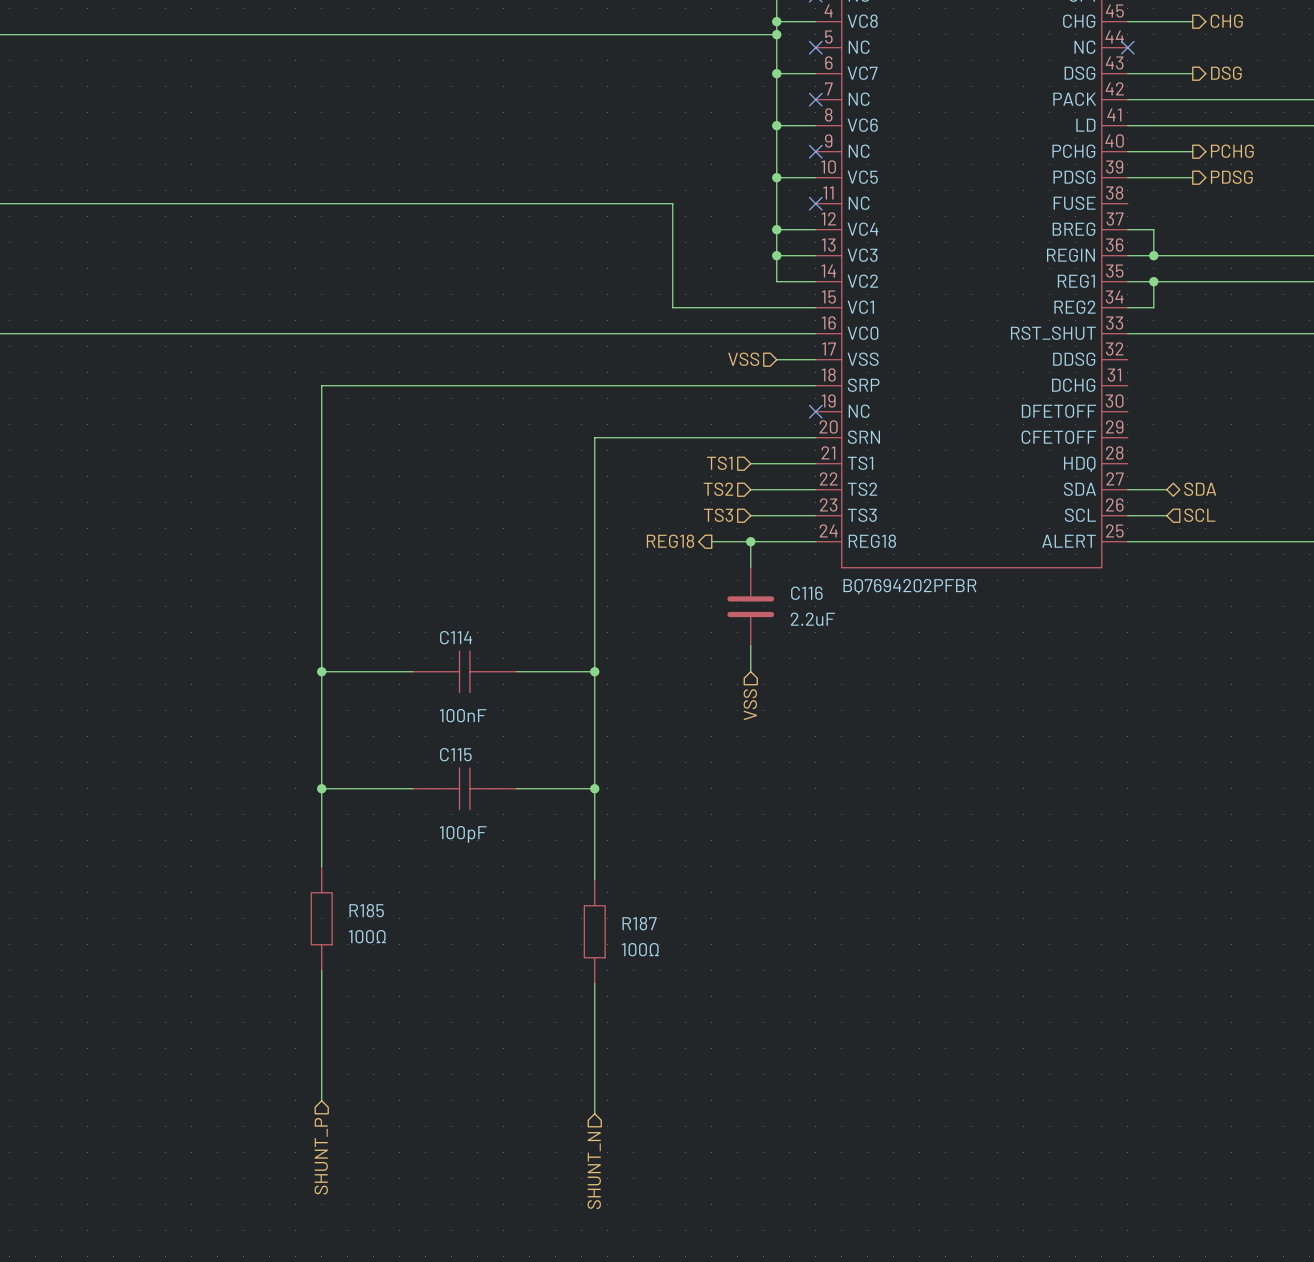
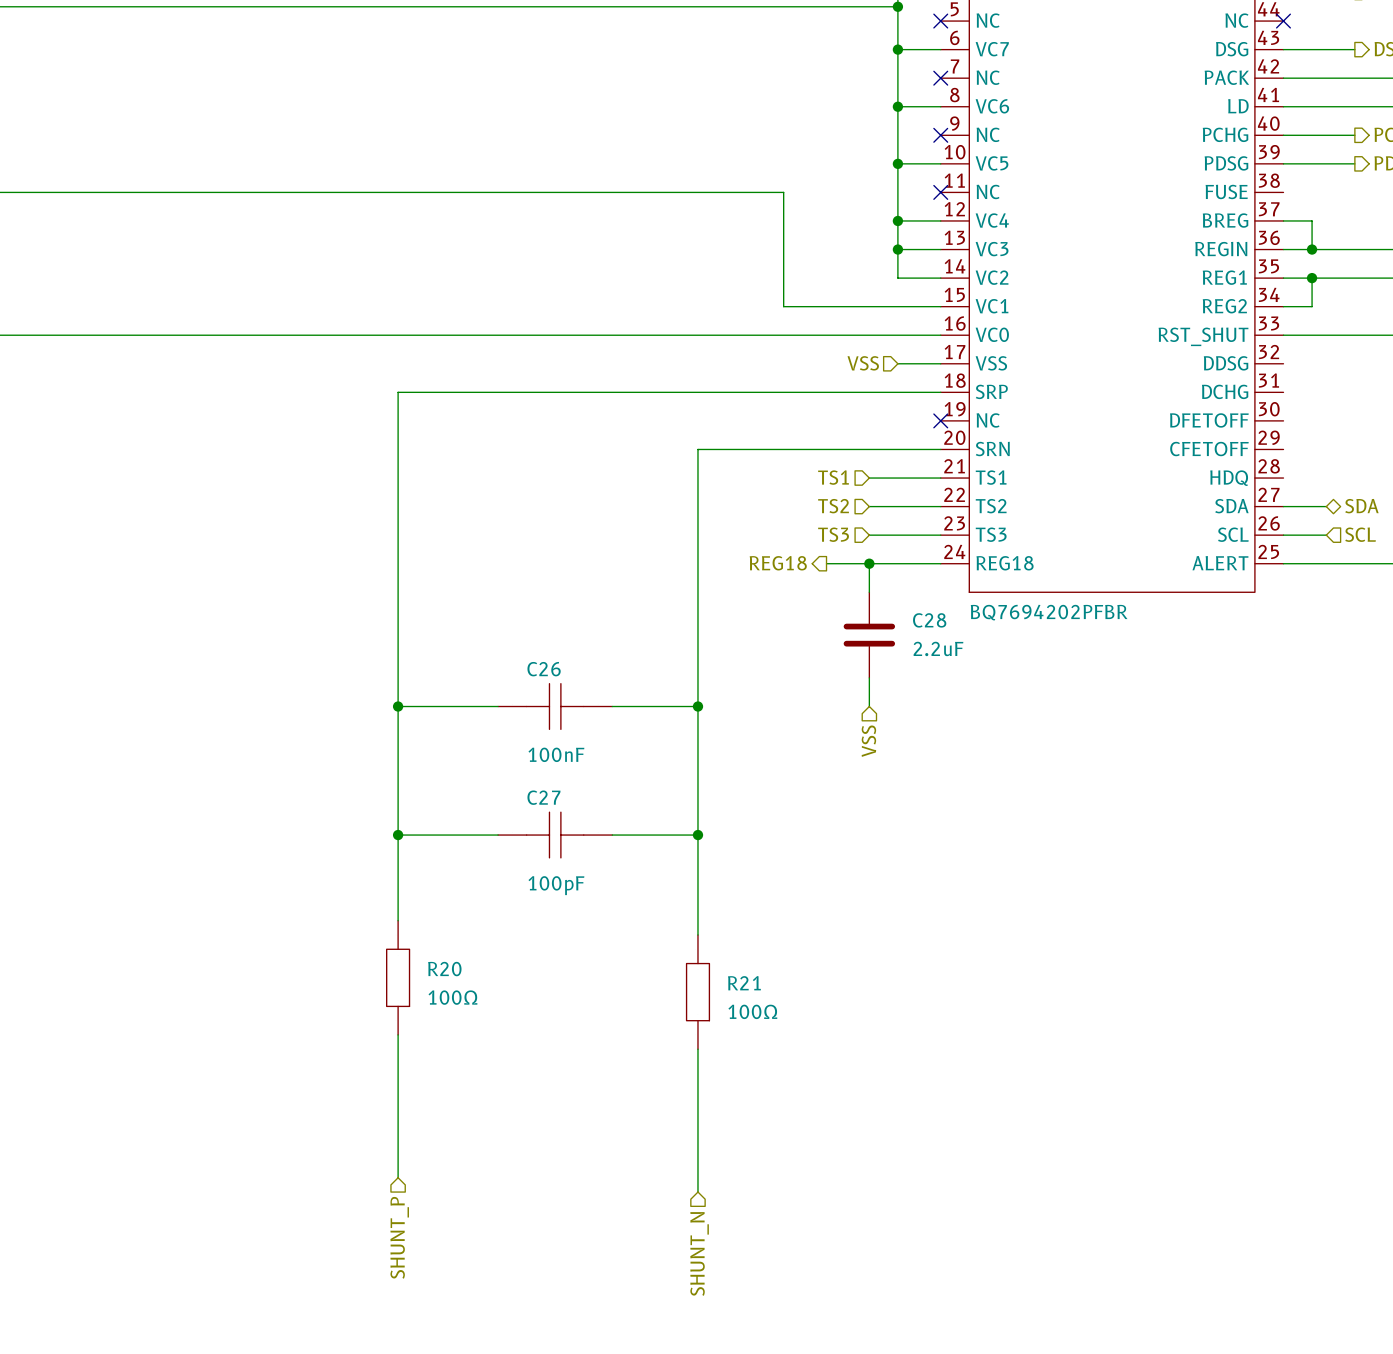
C116 name: C116 (806, 593) -> C28 (929, 620)
C114 name: C114 (456, 637) -> C26 (544, 669)
C115 name: C115 (455, 754) -> C27 (543, 797)
R185 name: R185 (366, 910) -> R20 (444, 969)
R187 name: R187 (639, 923) -> R21 (744, 983)

